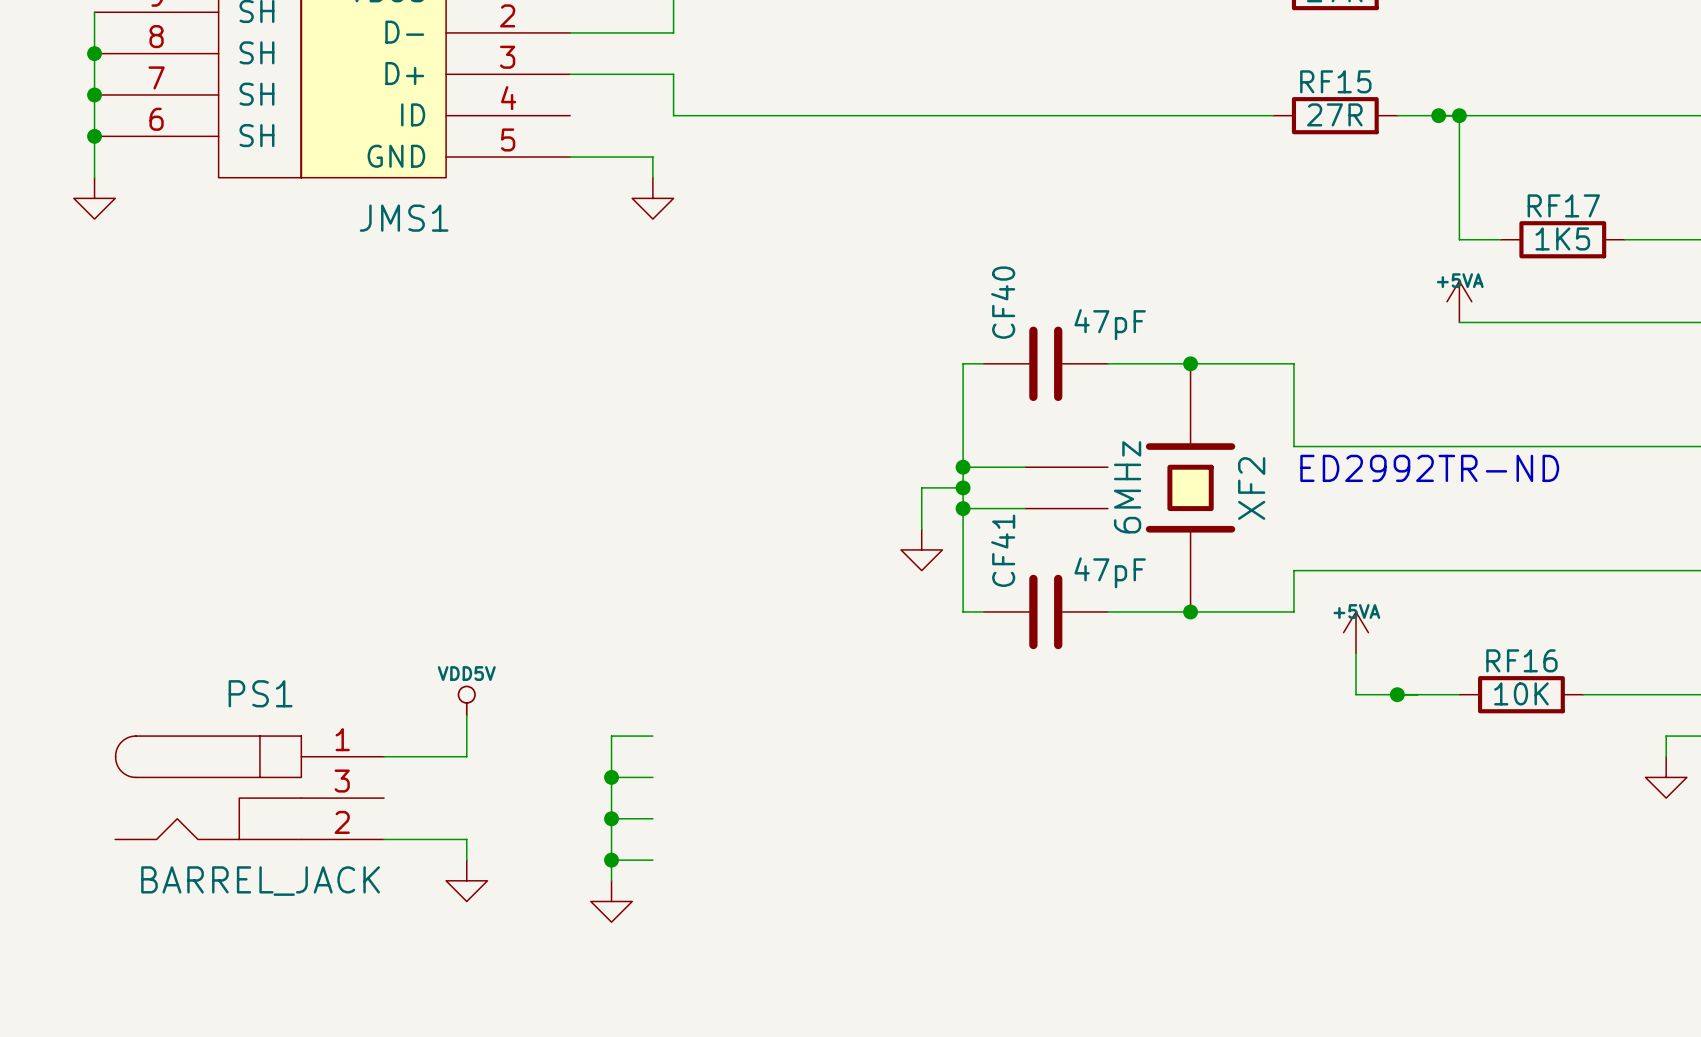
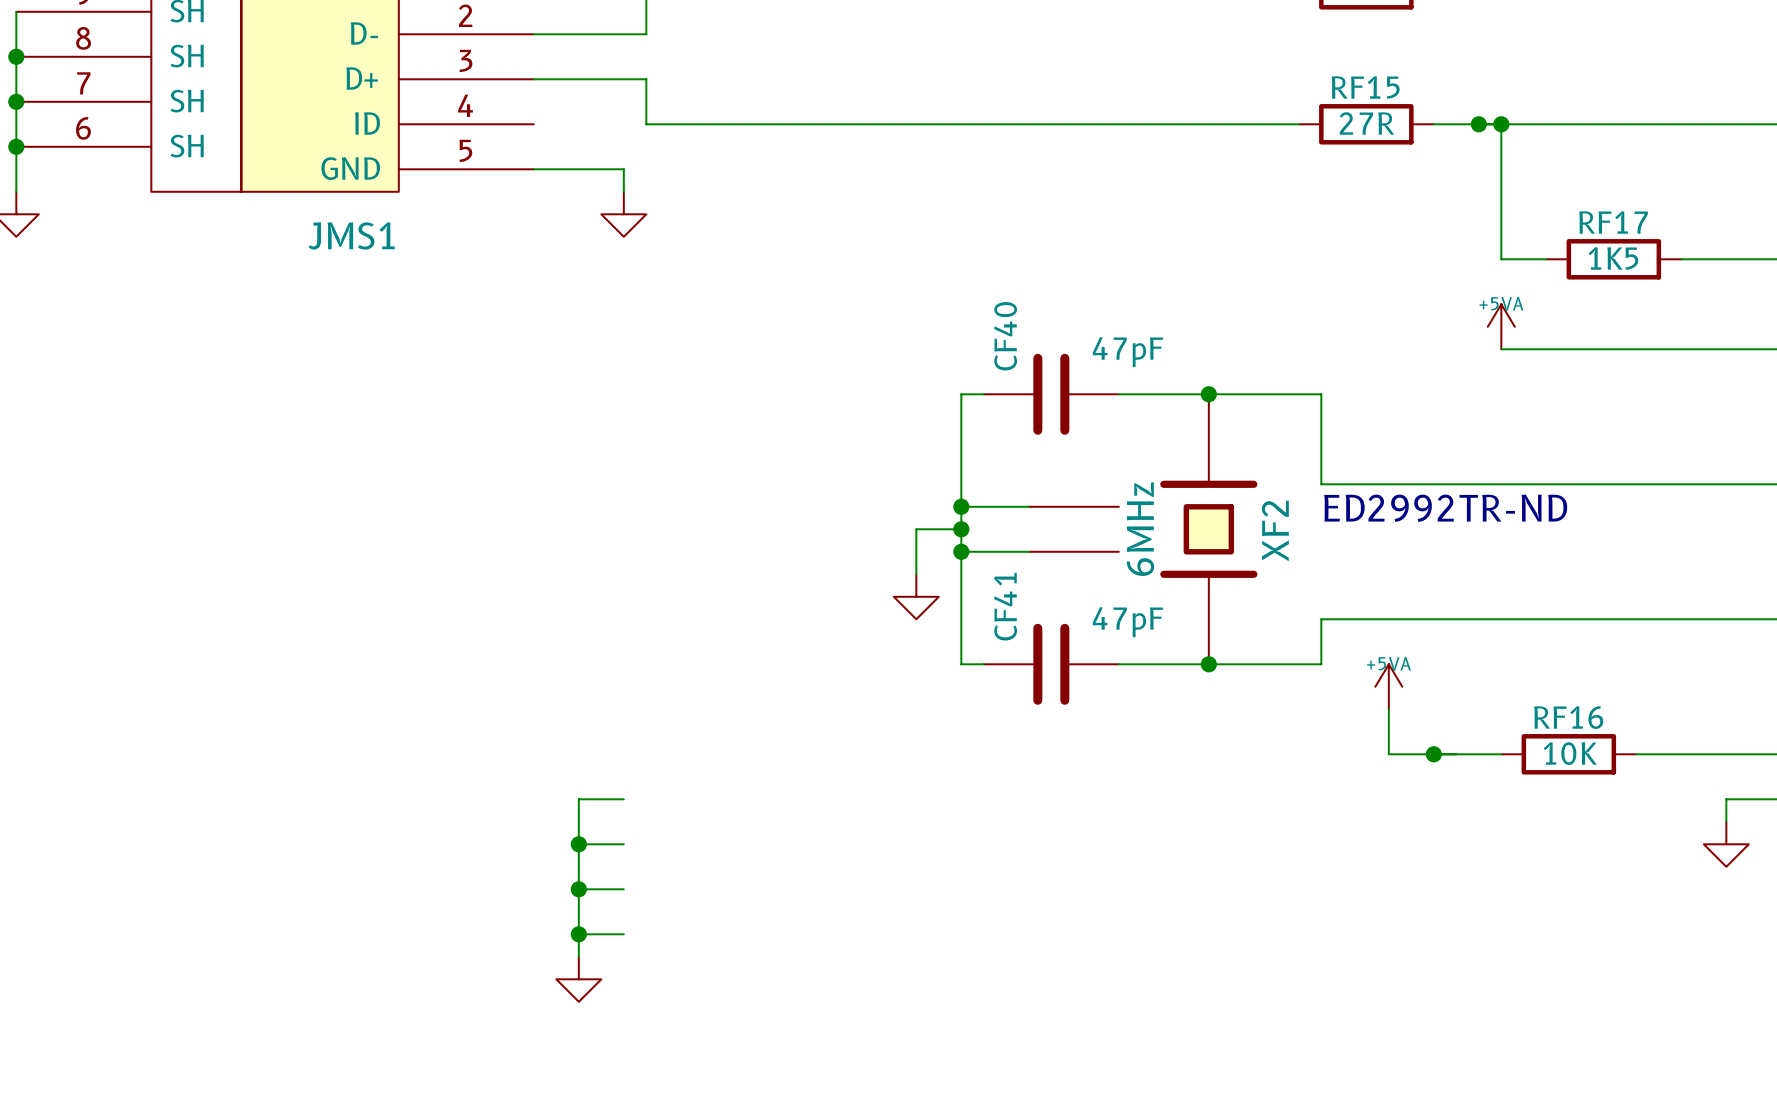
power symbol: VDD5V (466, 700) -> none
wire: (466, 715) (466, 756) (384, 756) -> none
PS1: BARREL_JACK (249, 787) -> none
wire: (384, 839) (466, 839) (466, 860) -> none
power symbol: (466, 880) -> none

